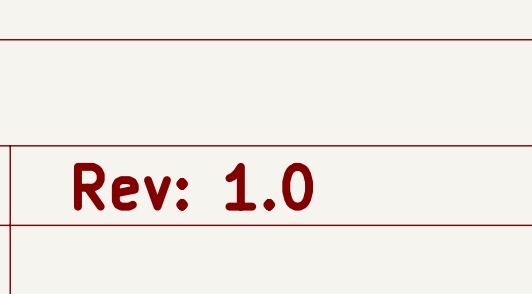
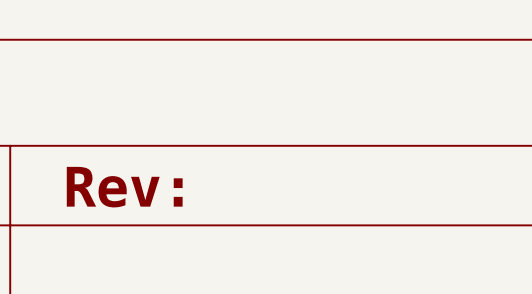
title block: Rev: 1.0 (193, 186) -> Rev: (124, 187)

